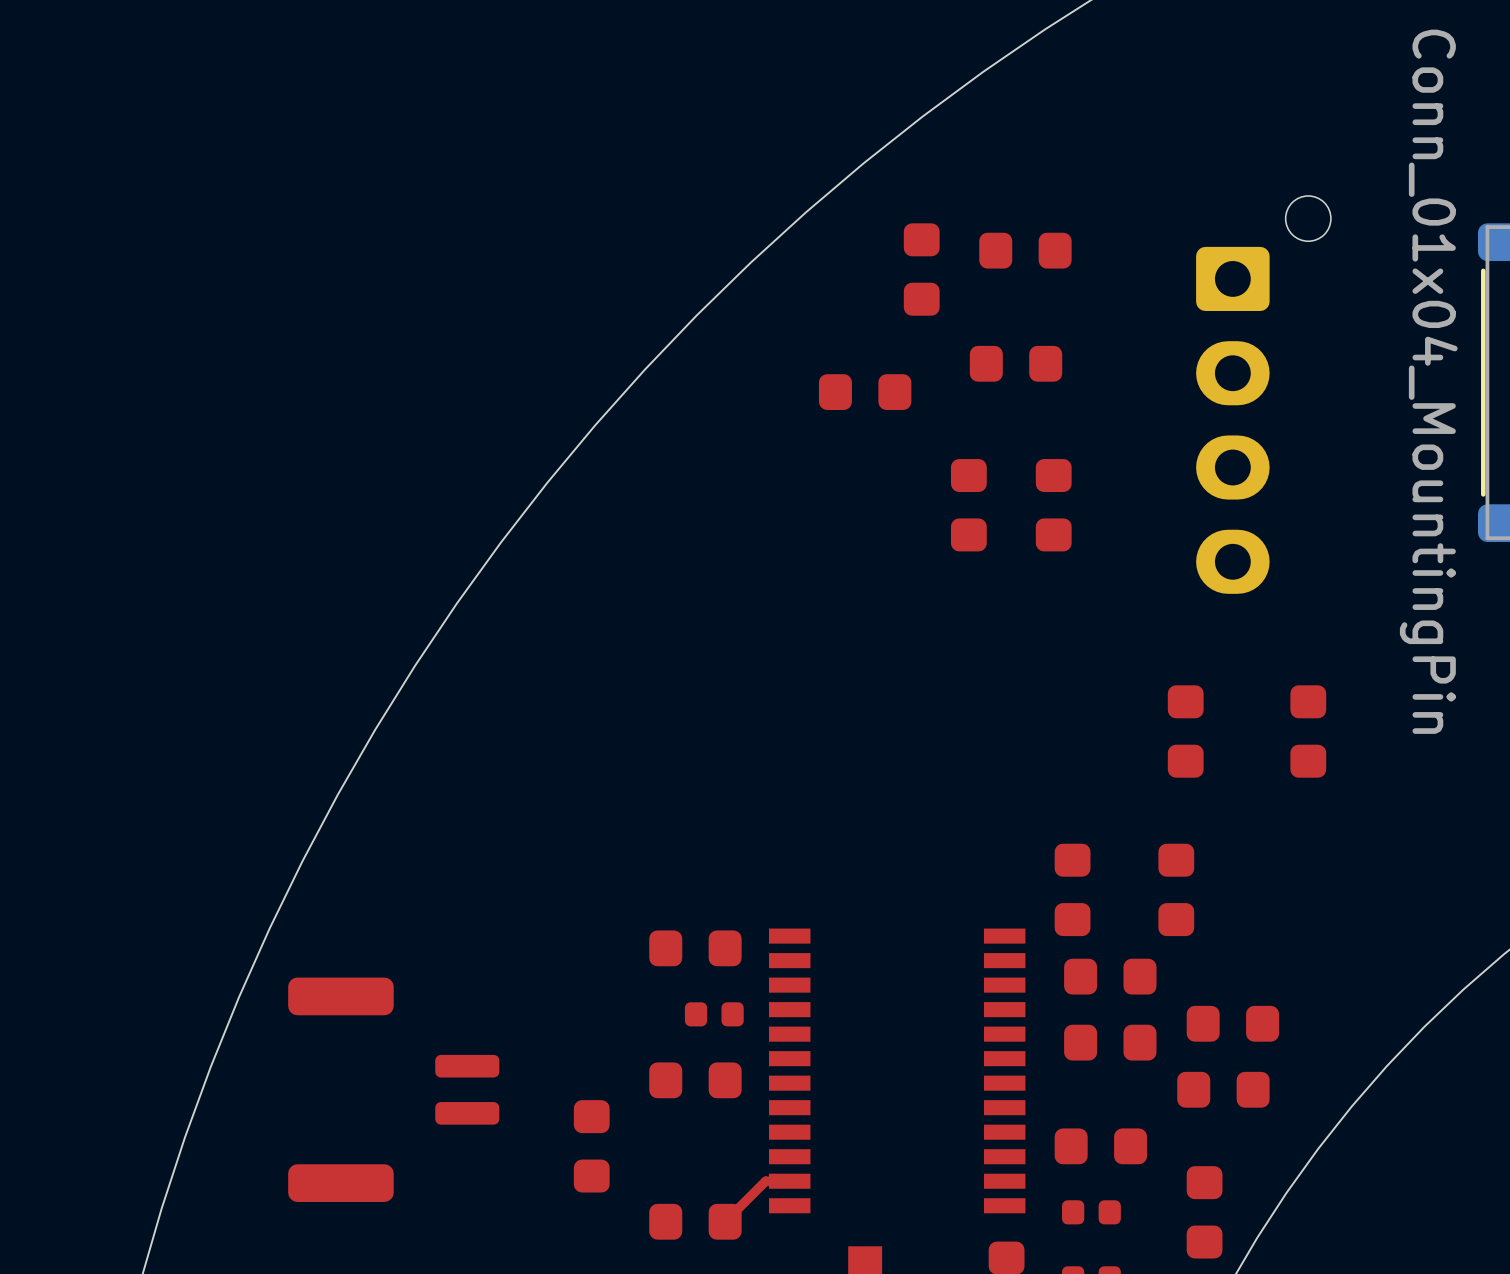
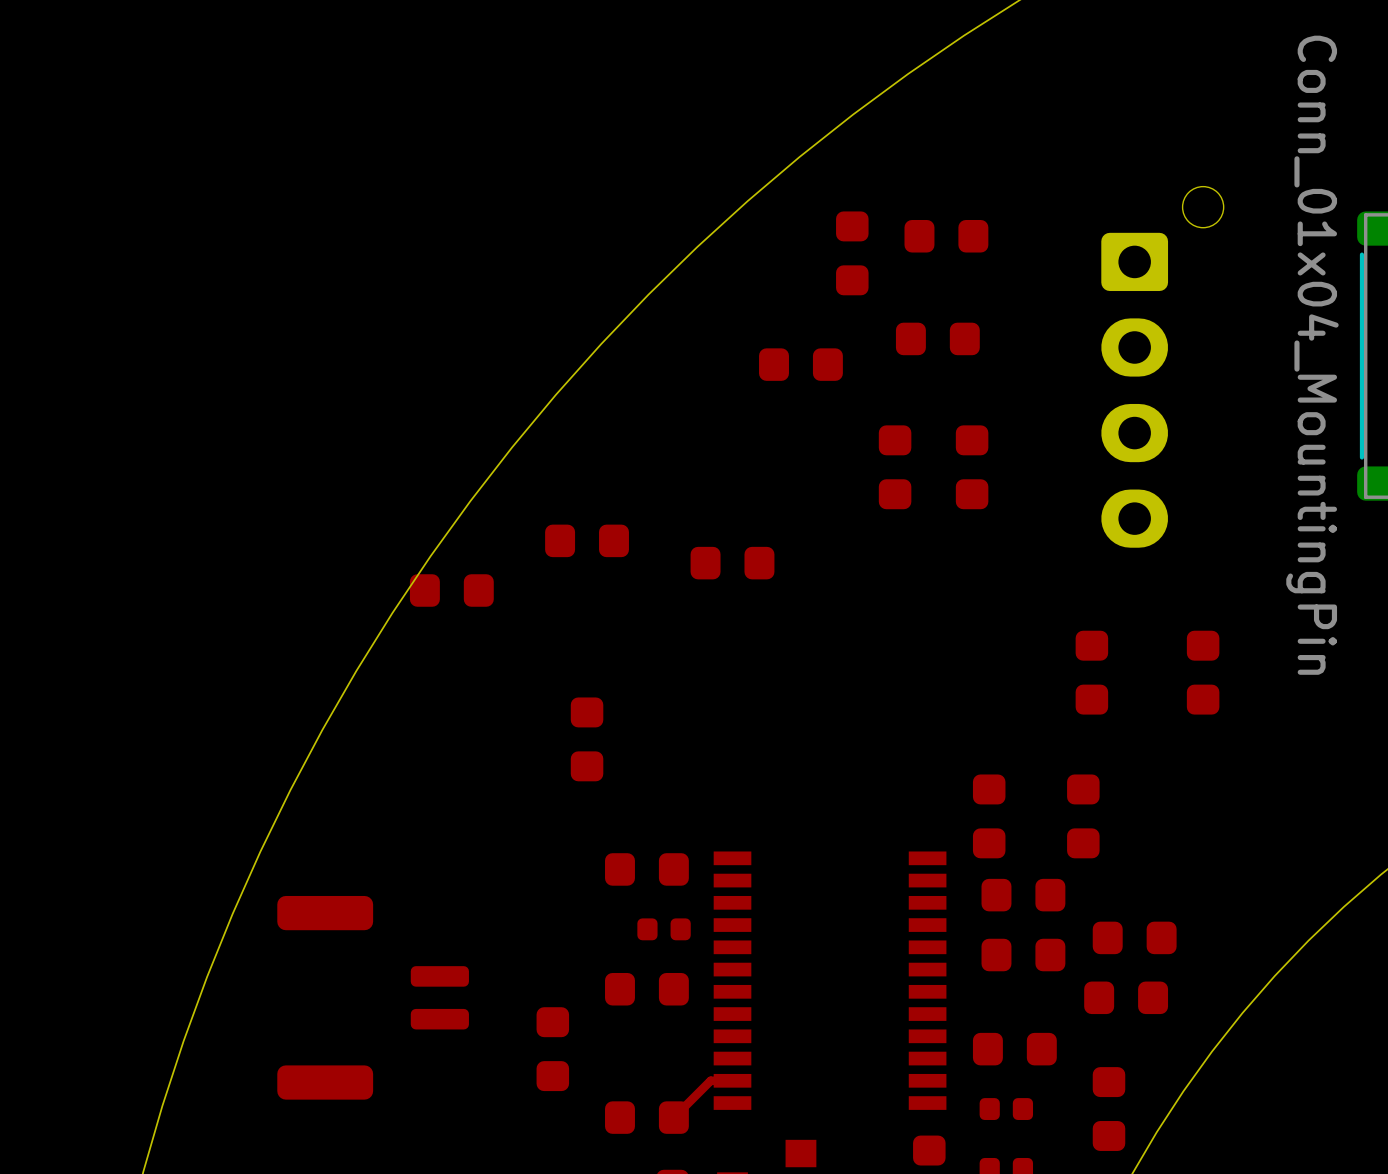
part: none -> (587, 540)
part: none -> (732, 563)
part: none -> (451, 590)
part: none -> (587, 739)

